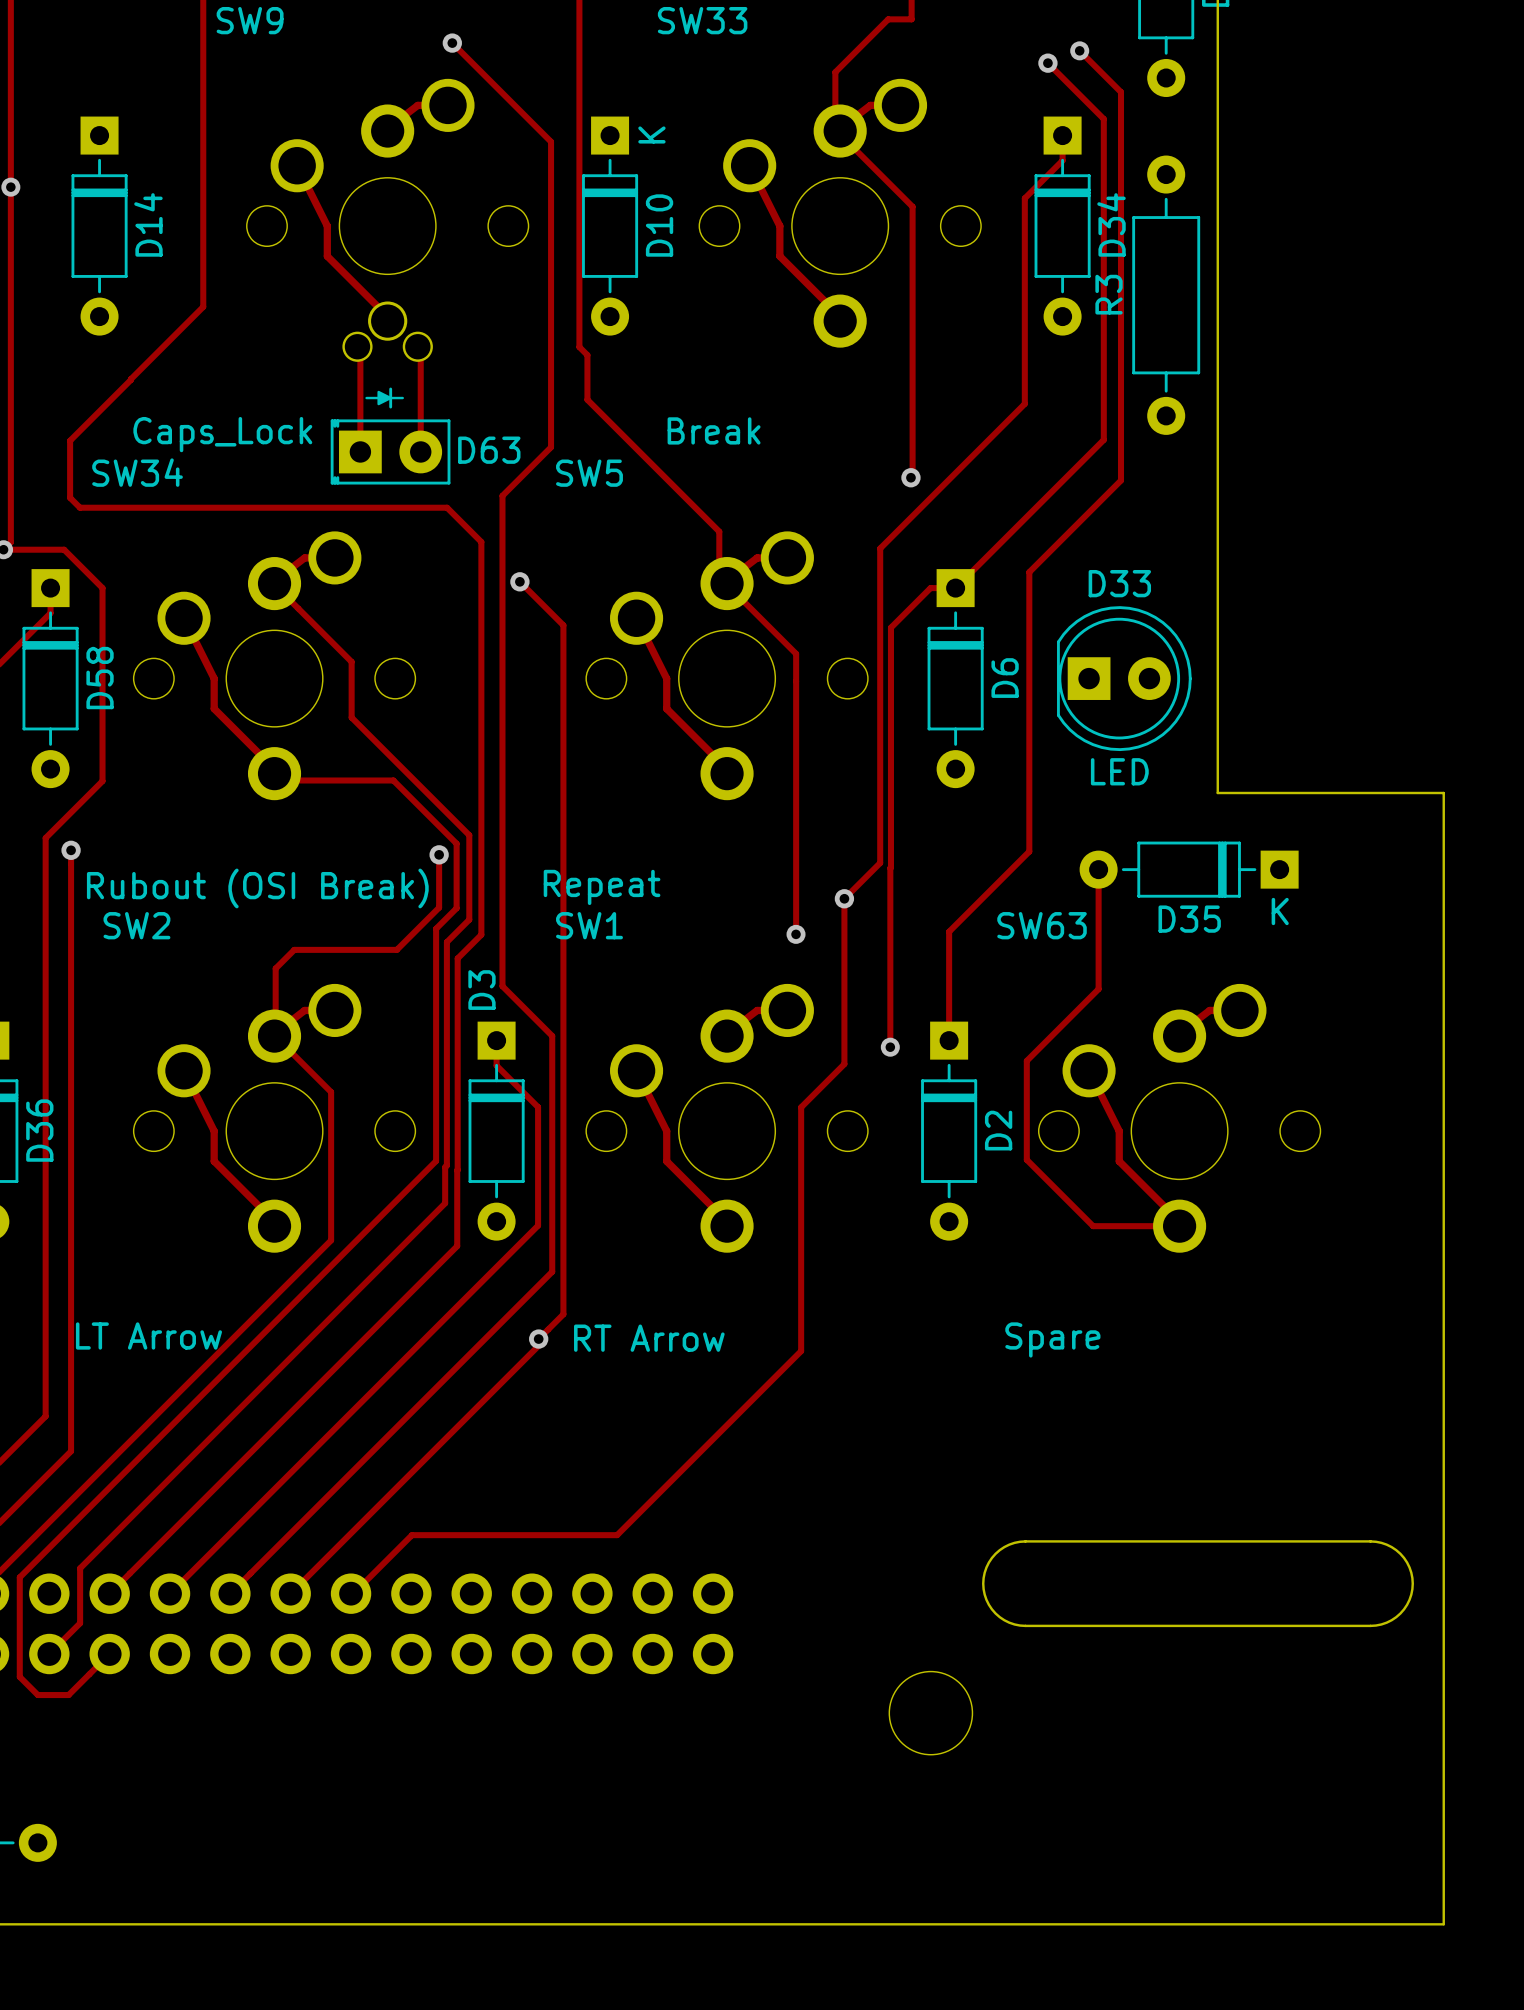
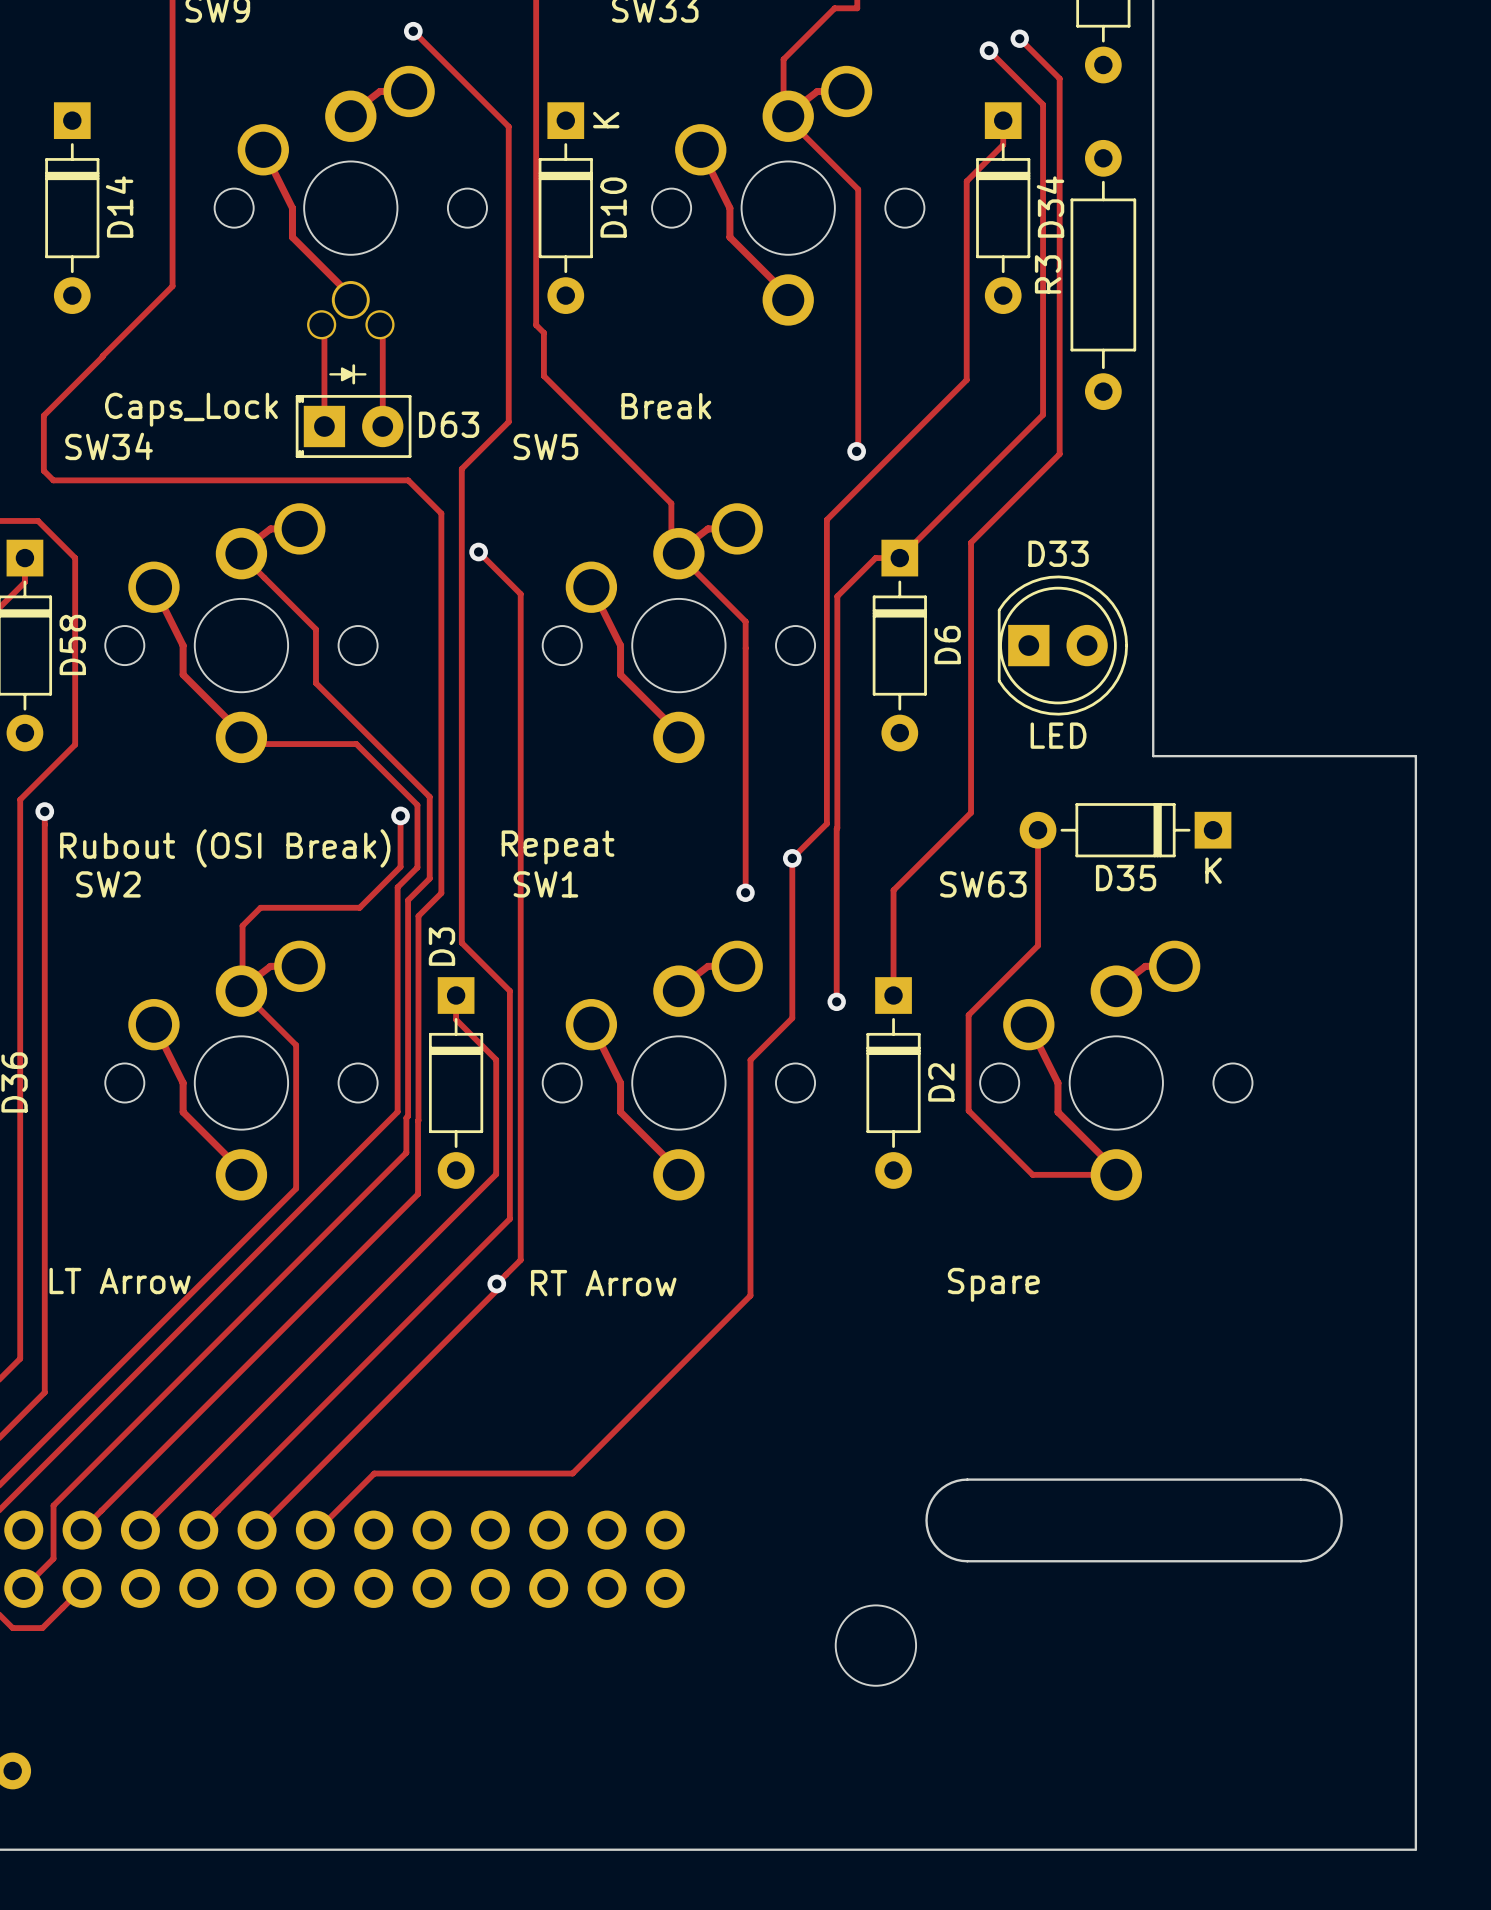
board edge: (1443, 793) (1443, 1924) -> (1371, 756) (1415, 756) (1415, 1849) (1371, 1849)

